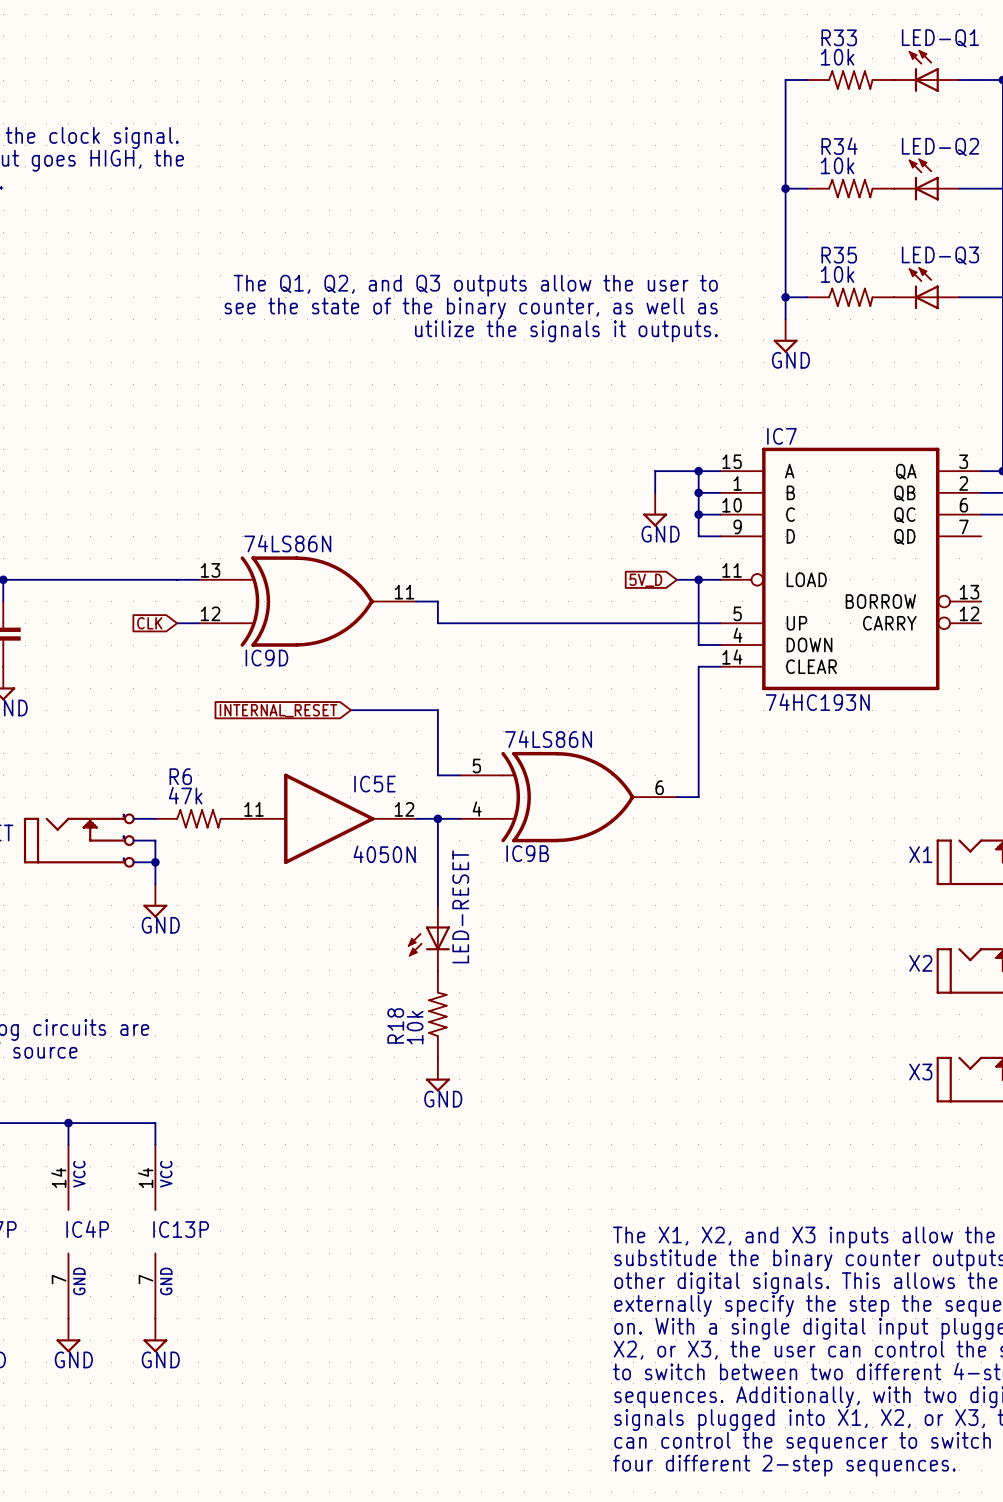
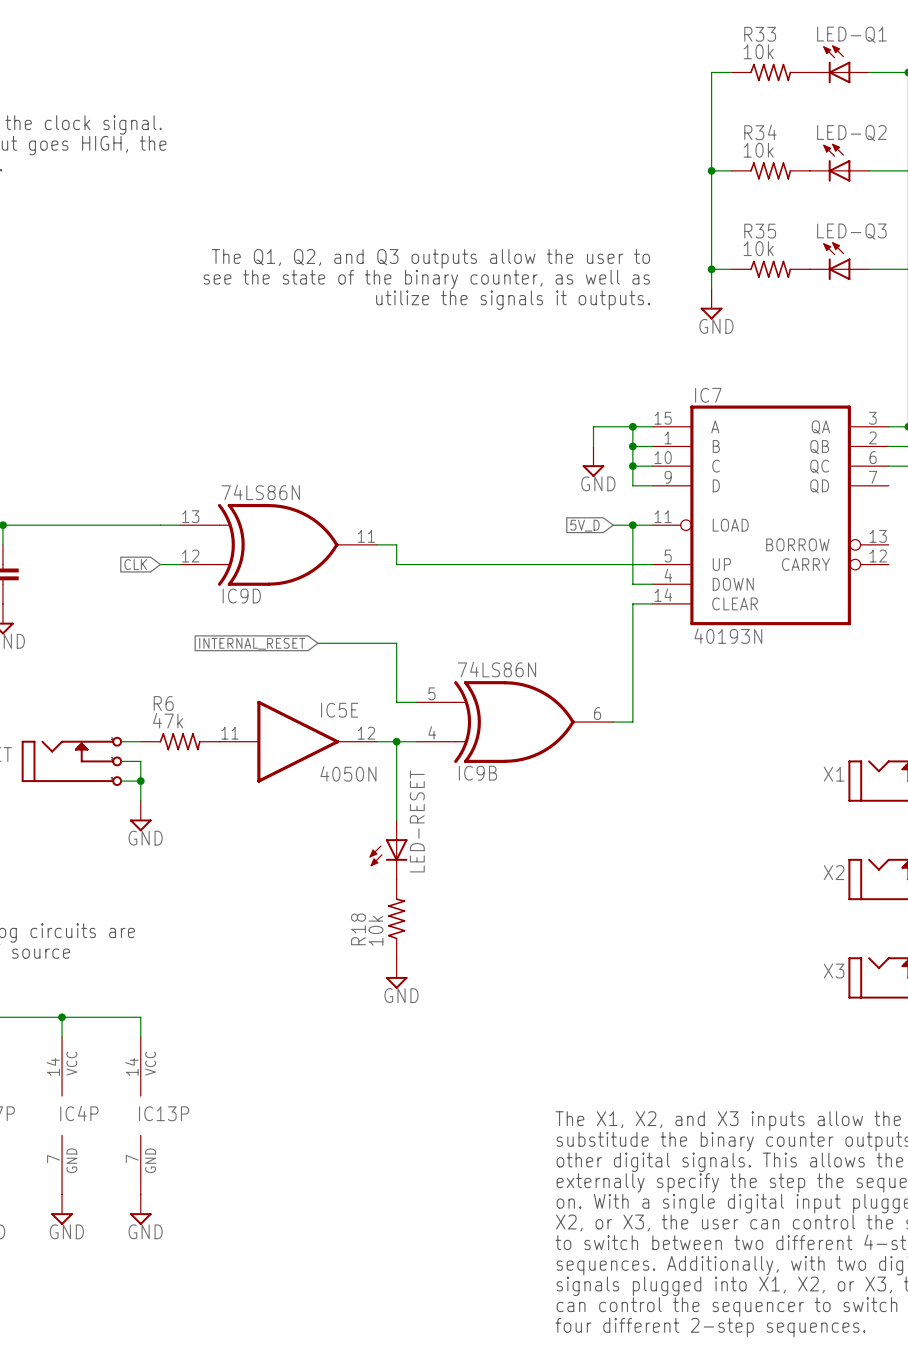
IC7 value: 74HC193N (817, 702) -> 40193N (728, 636)

